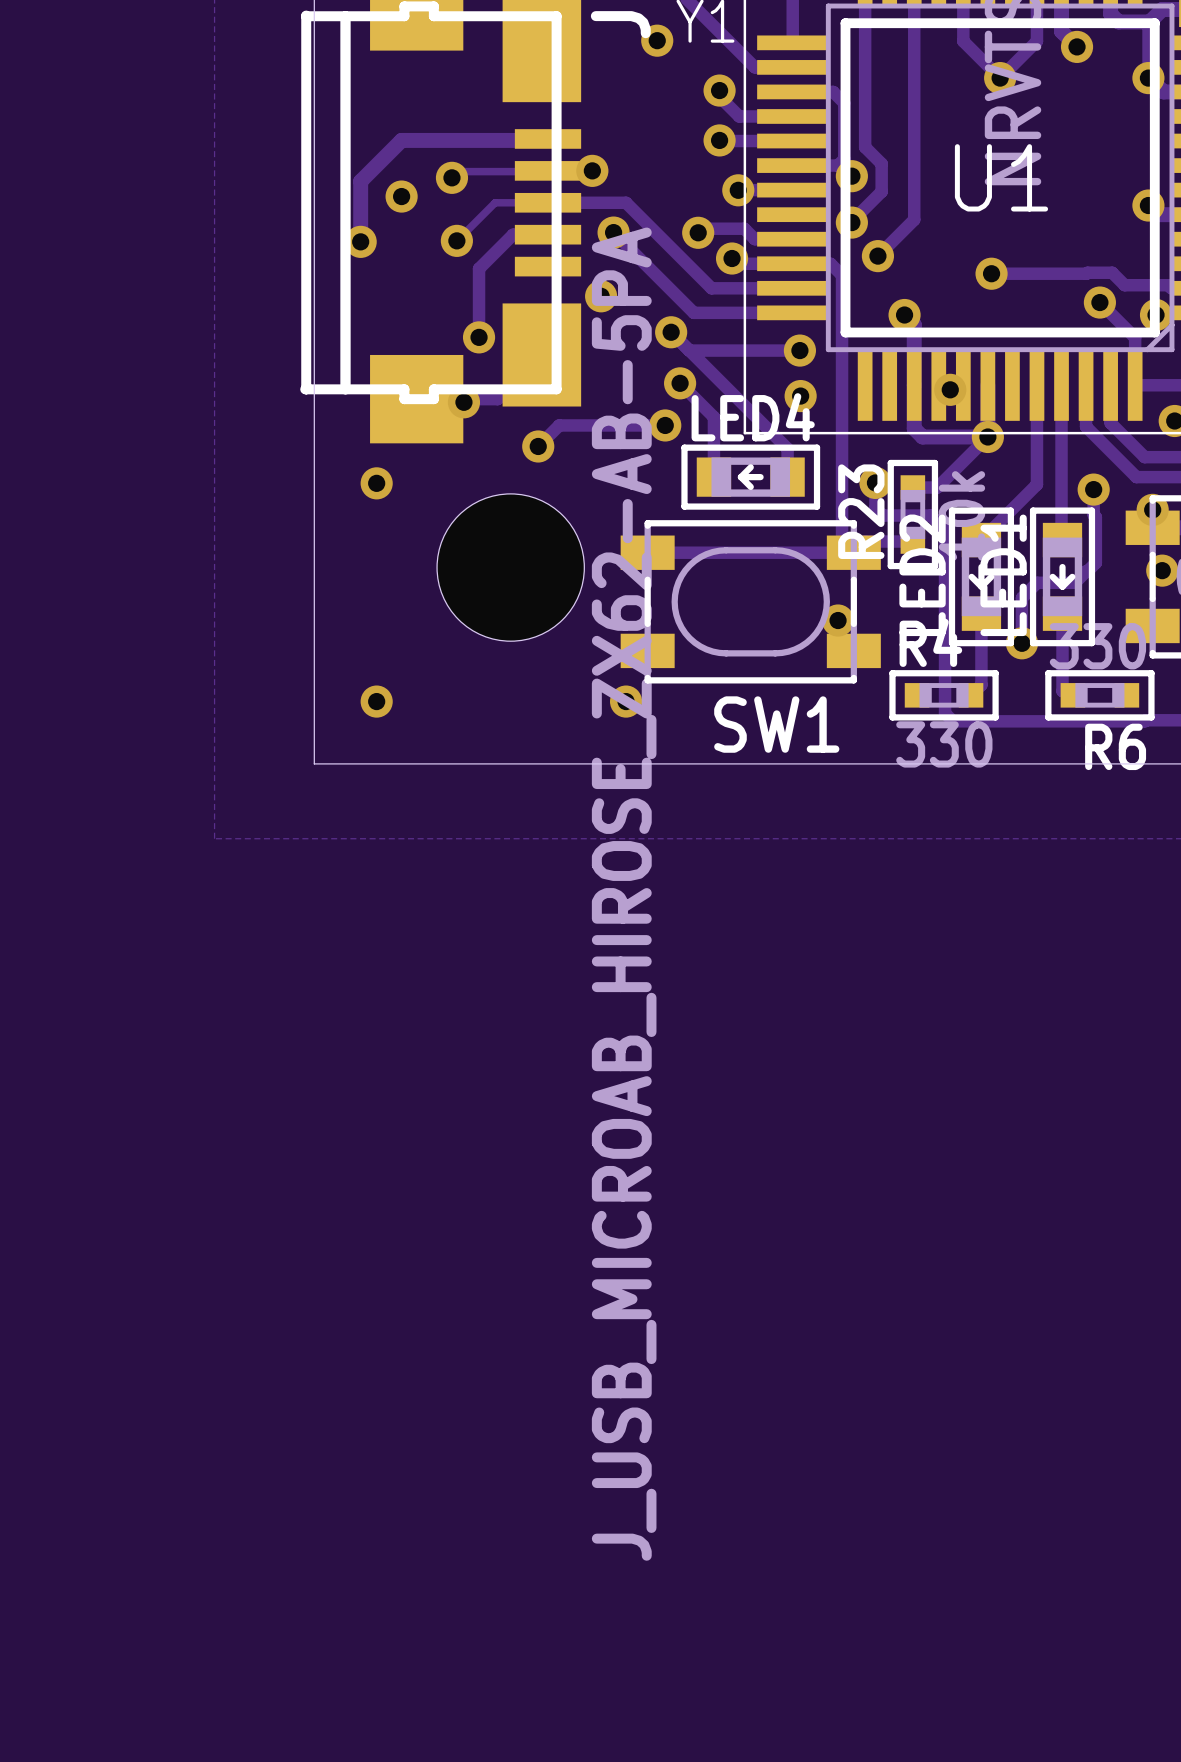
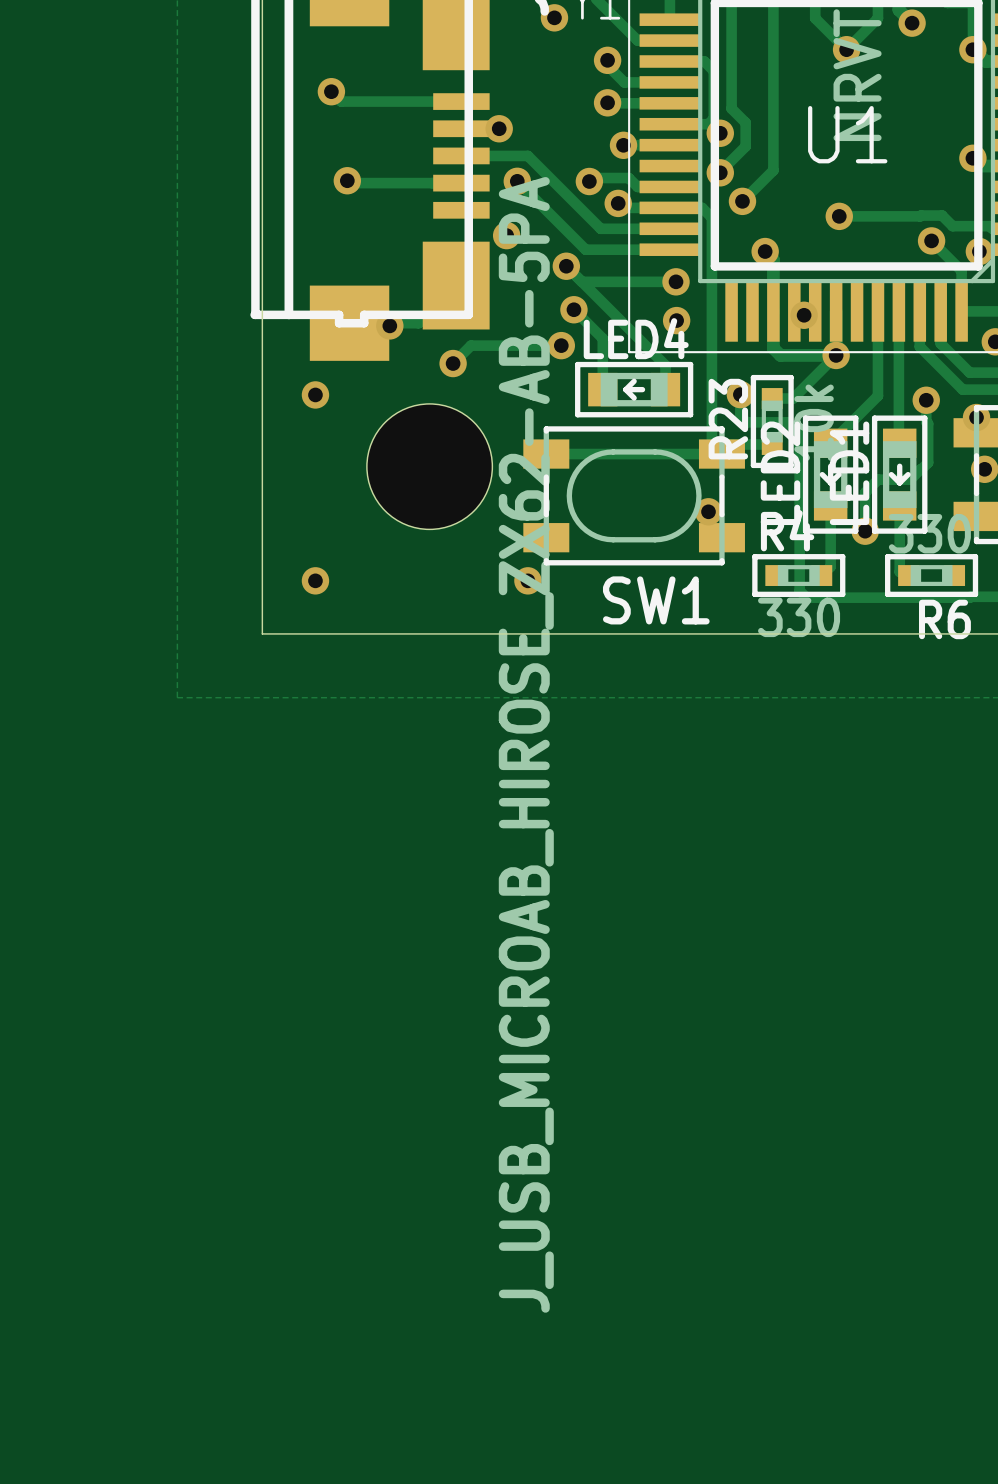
via: none -> (331, 91)
track: (548, 138) (401, 140) (360, 181) (360, 241) -> (461, 101) (341, 101) (331, 91)
track: (548, 170) (457, 171) (451, 177) -> none
via: (451, 177) -> none
via: (401, 196) -> none
track: (557, 202) (495, 202) (457, 240) -> none
via: none -> (347, 180)
track: (513, 234) (479, 268) (479, 337) -> (431, 183) (349, 183) (347, 180)
via: (456, 240) -> none
via: (360, 241) -> none
via: (479, 337) -> none

